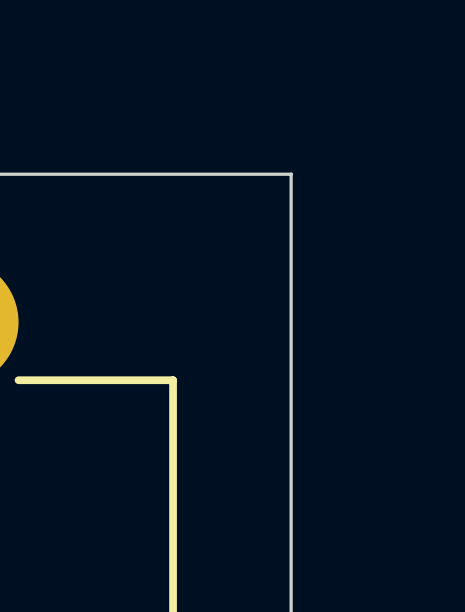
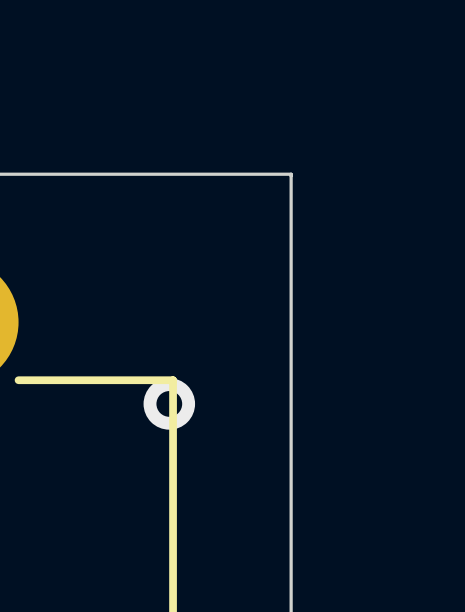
via: none -> (169, 403)

